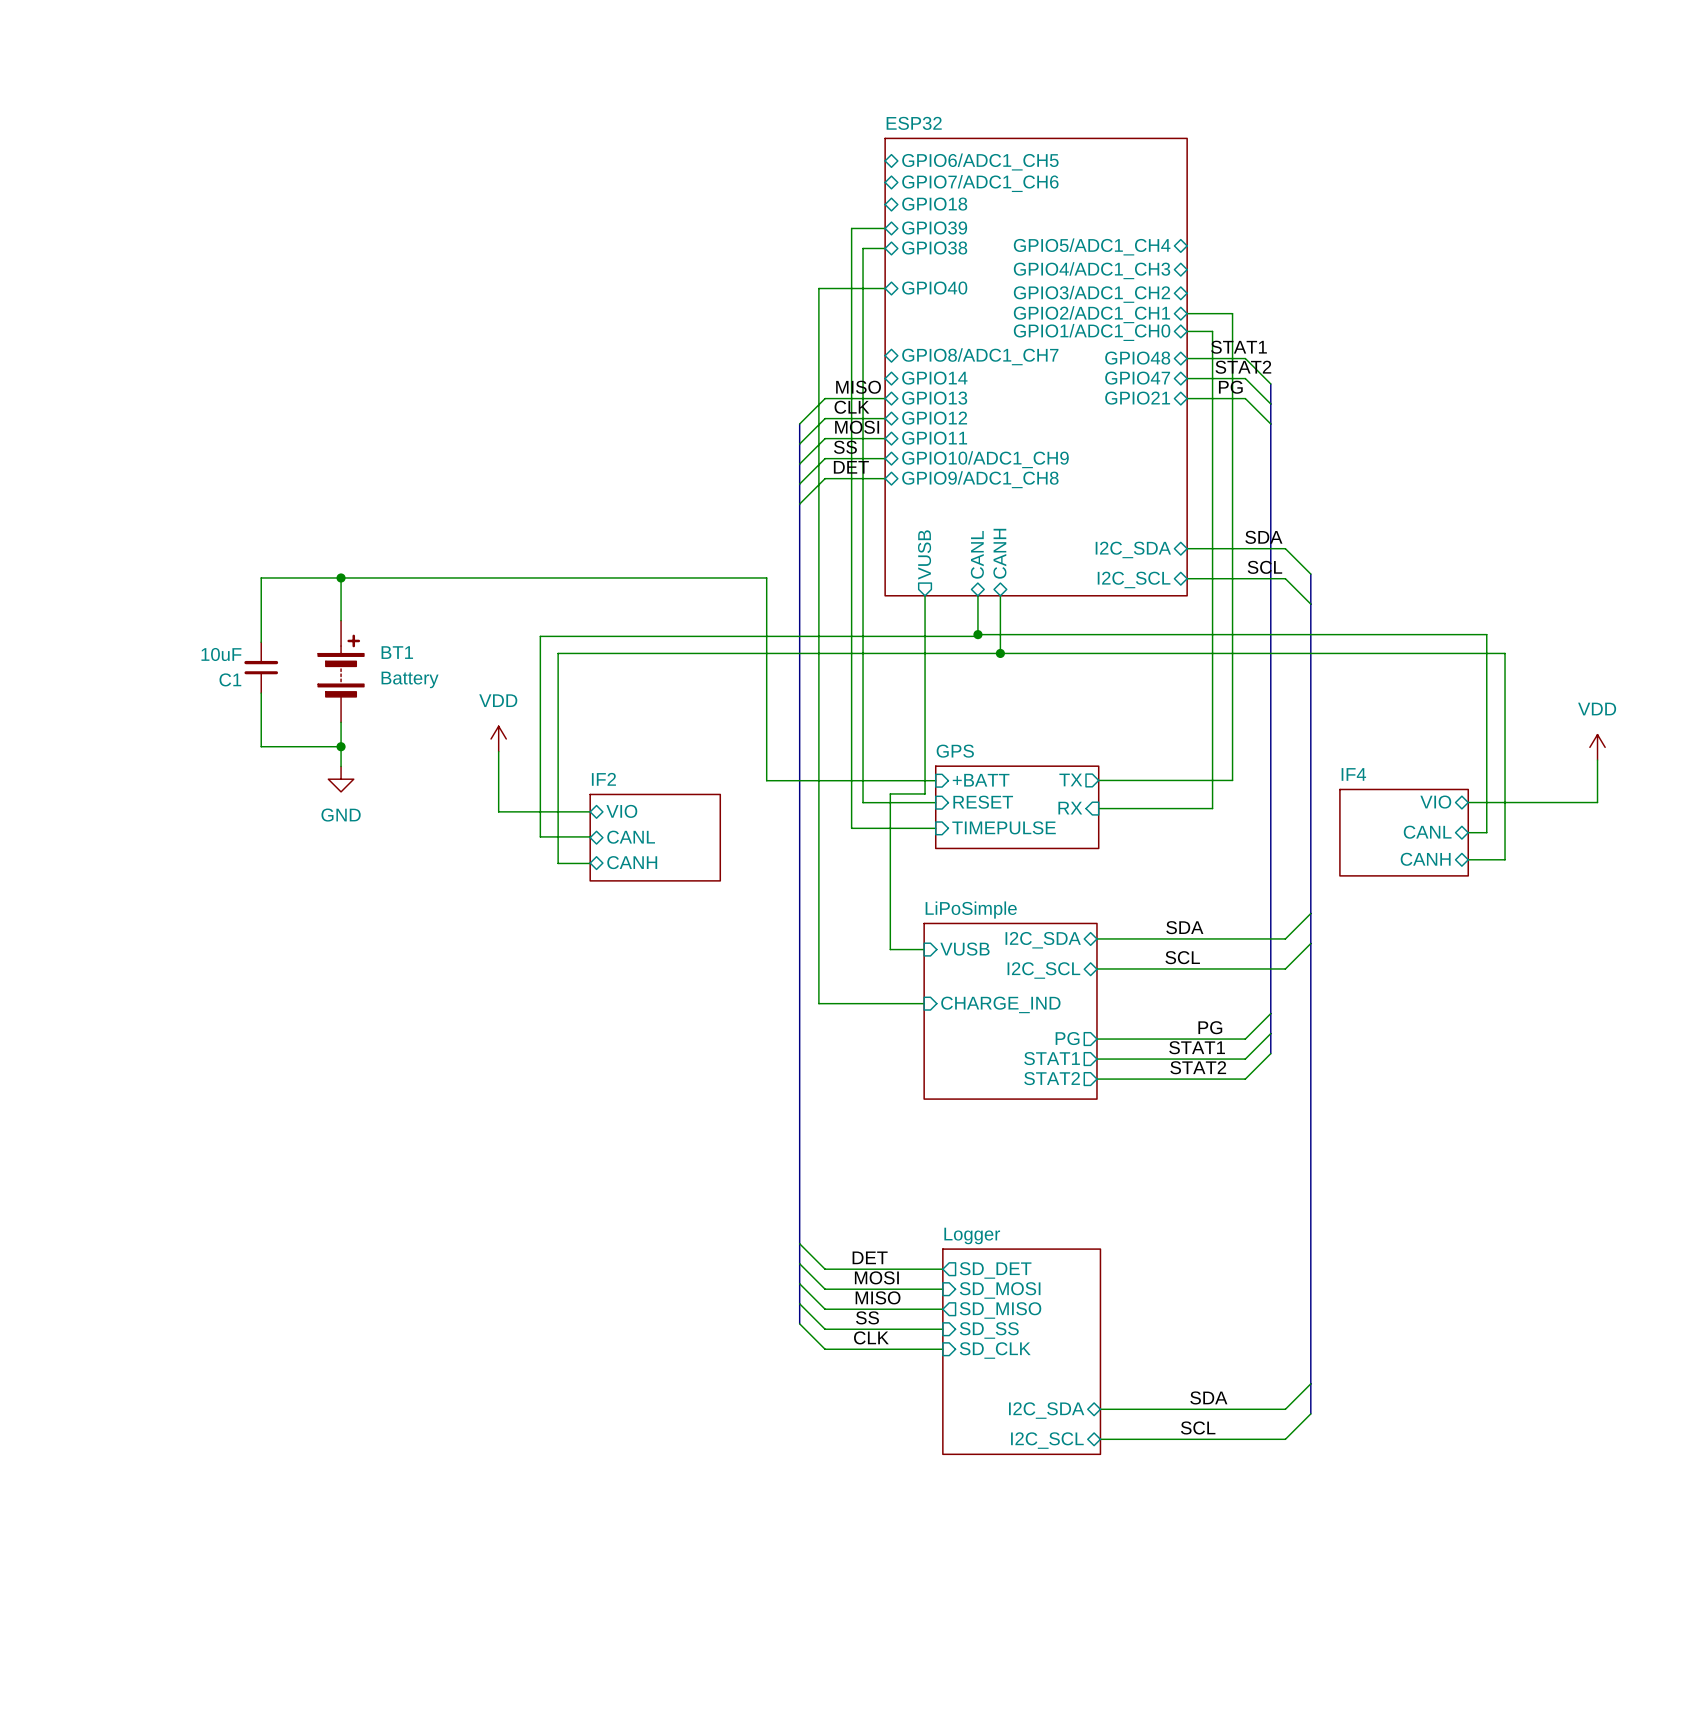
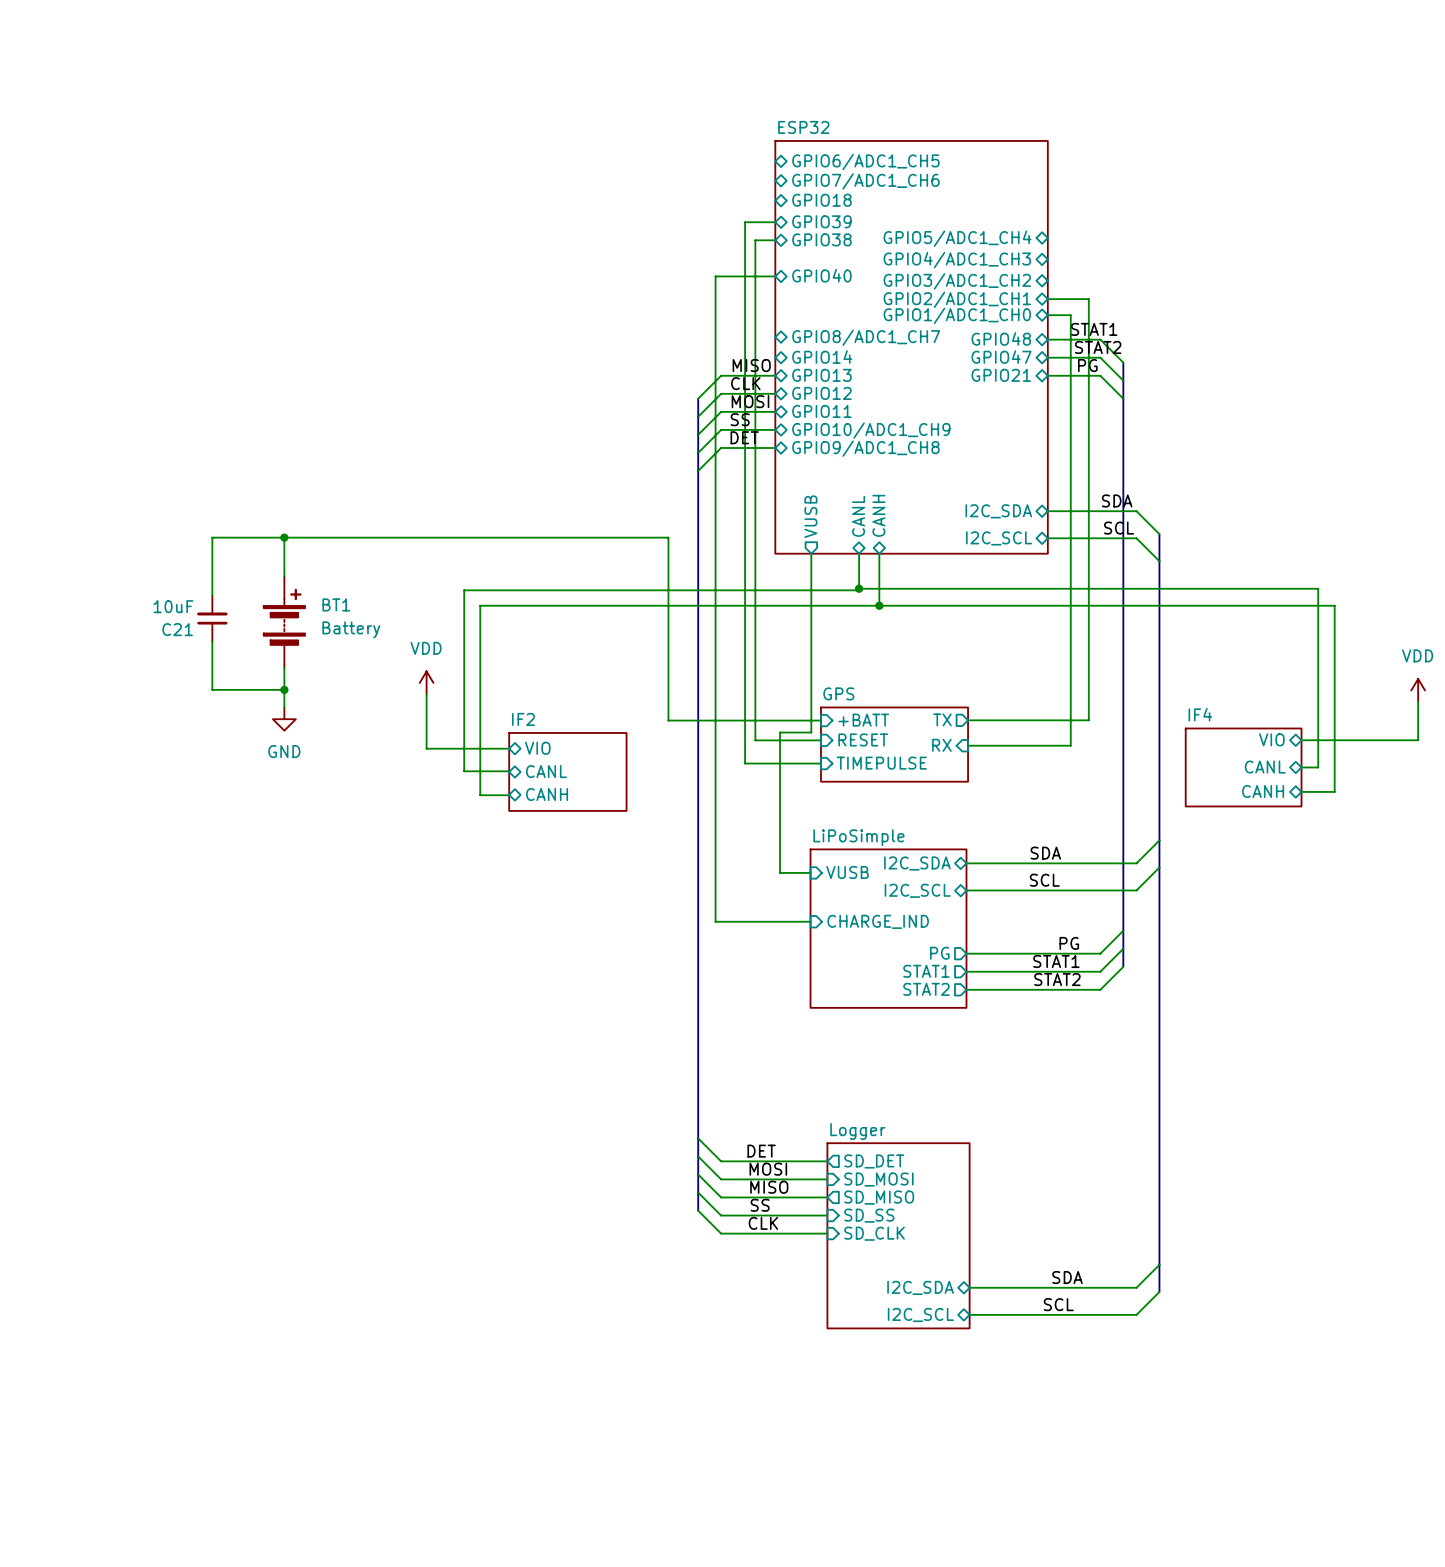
C1 name: C1 (230, 679) -> C21 (177, 629)

